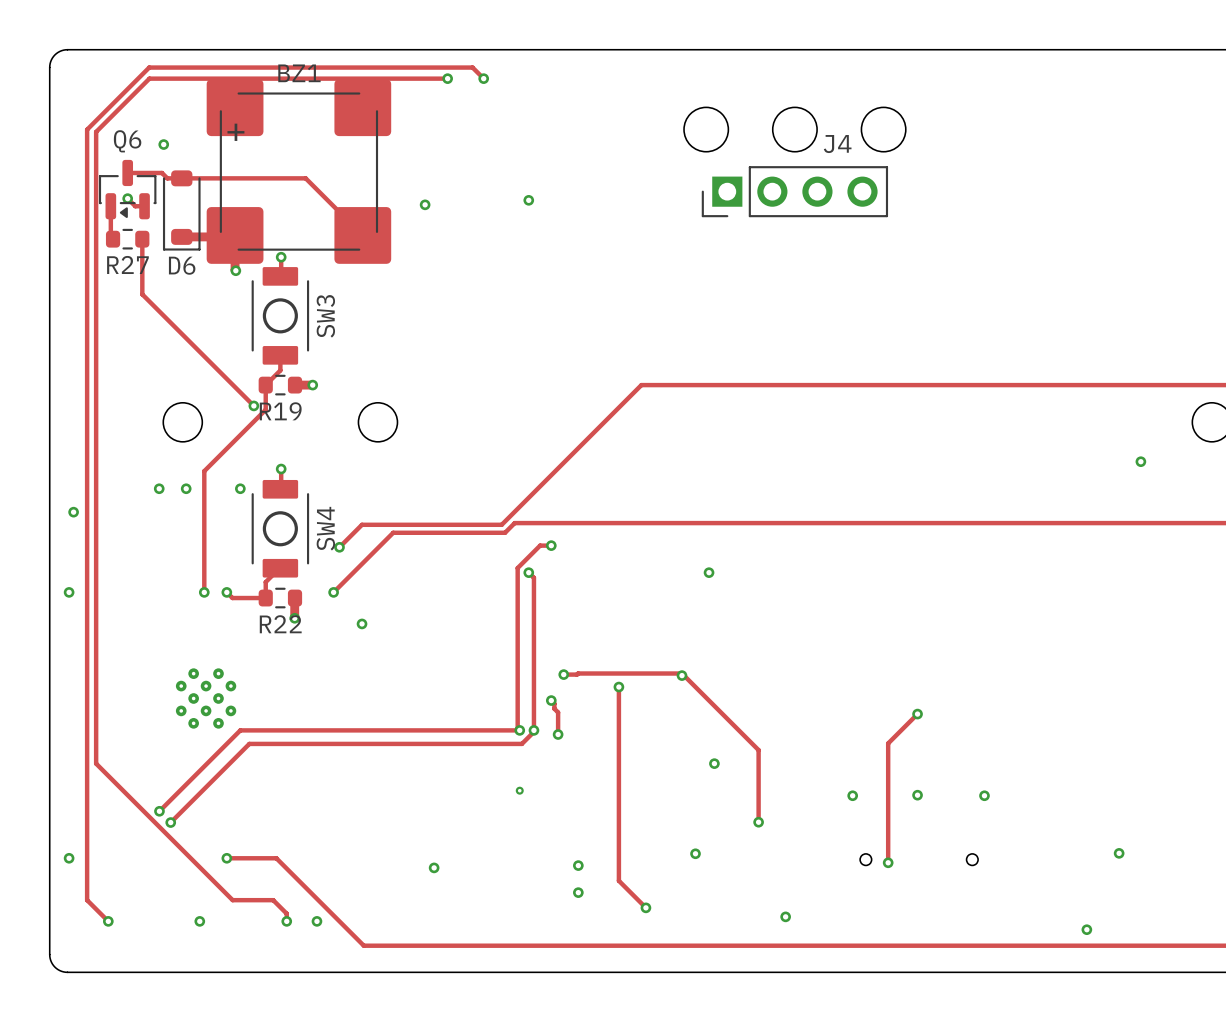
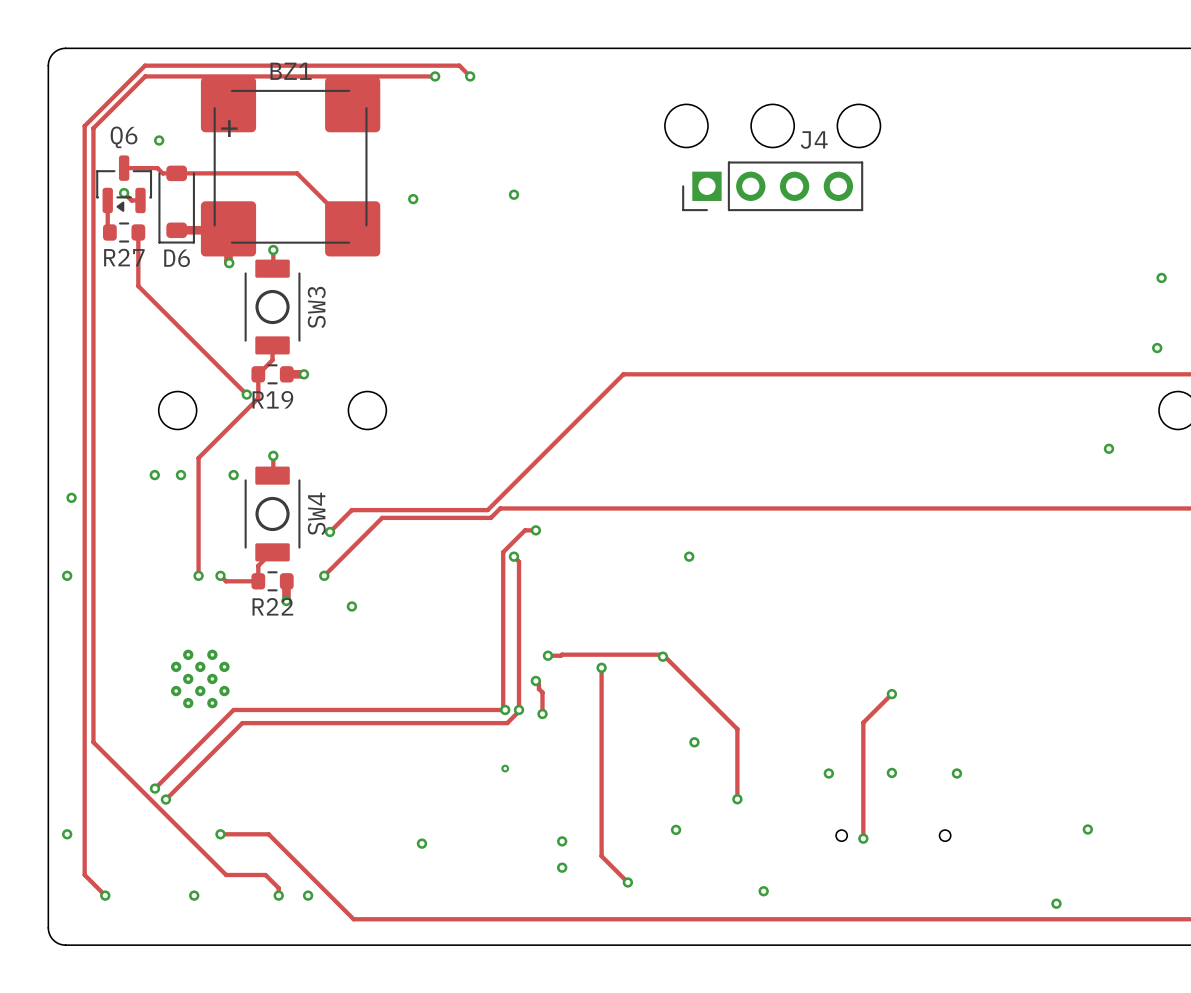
via: none -> (1161, 277)
via: none -> (1157, 348)

